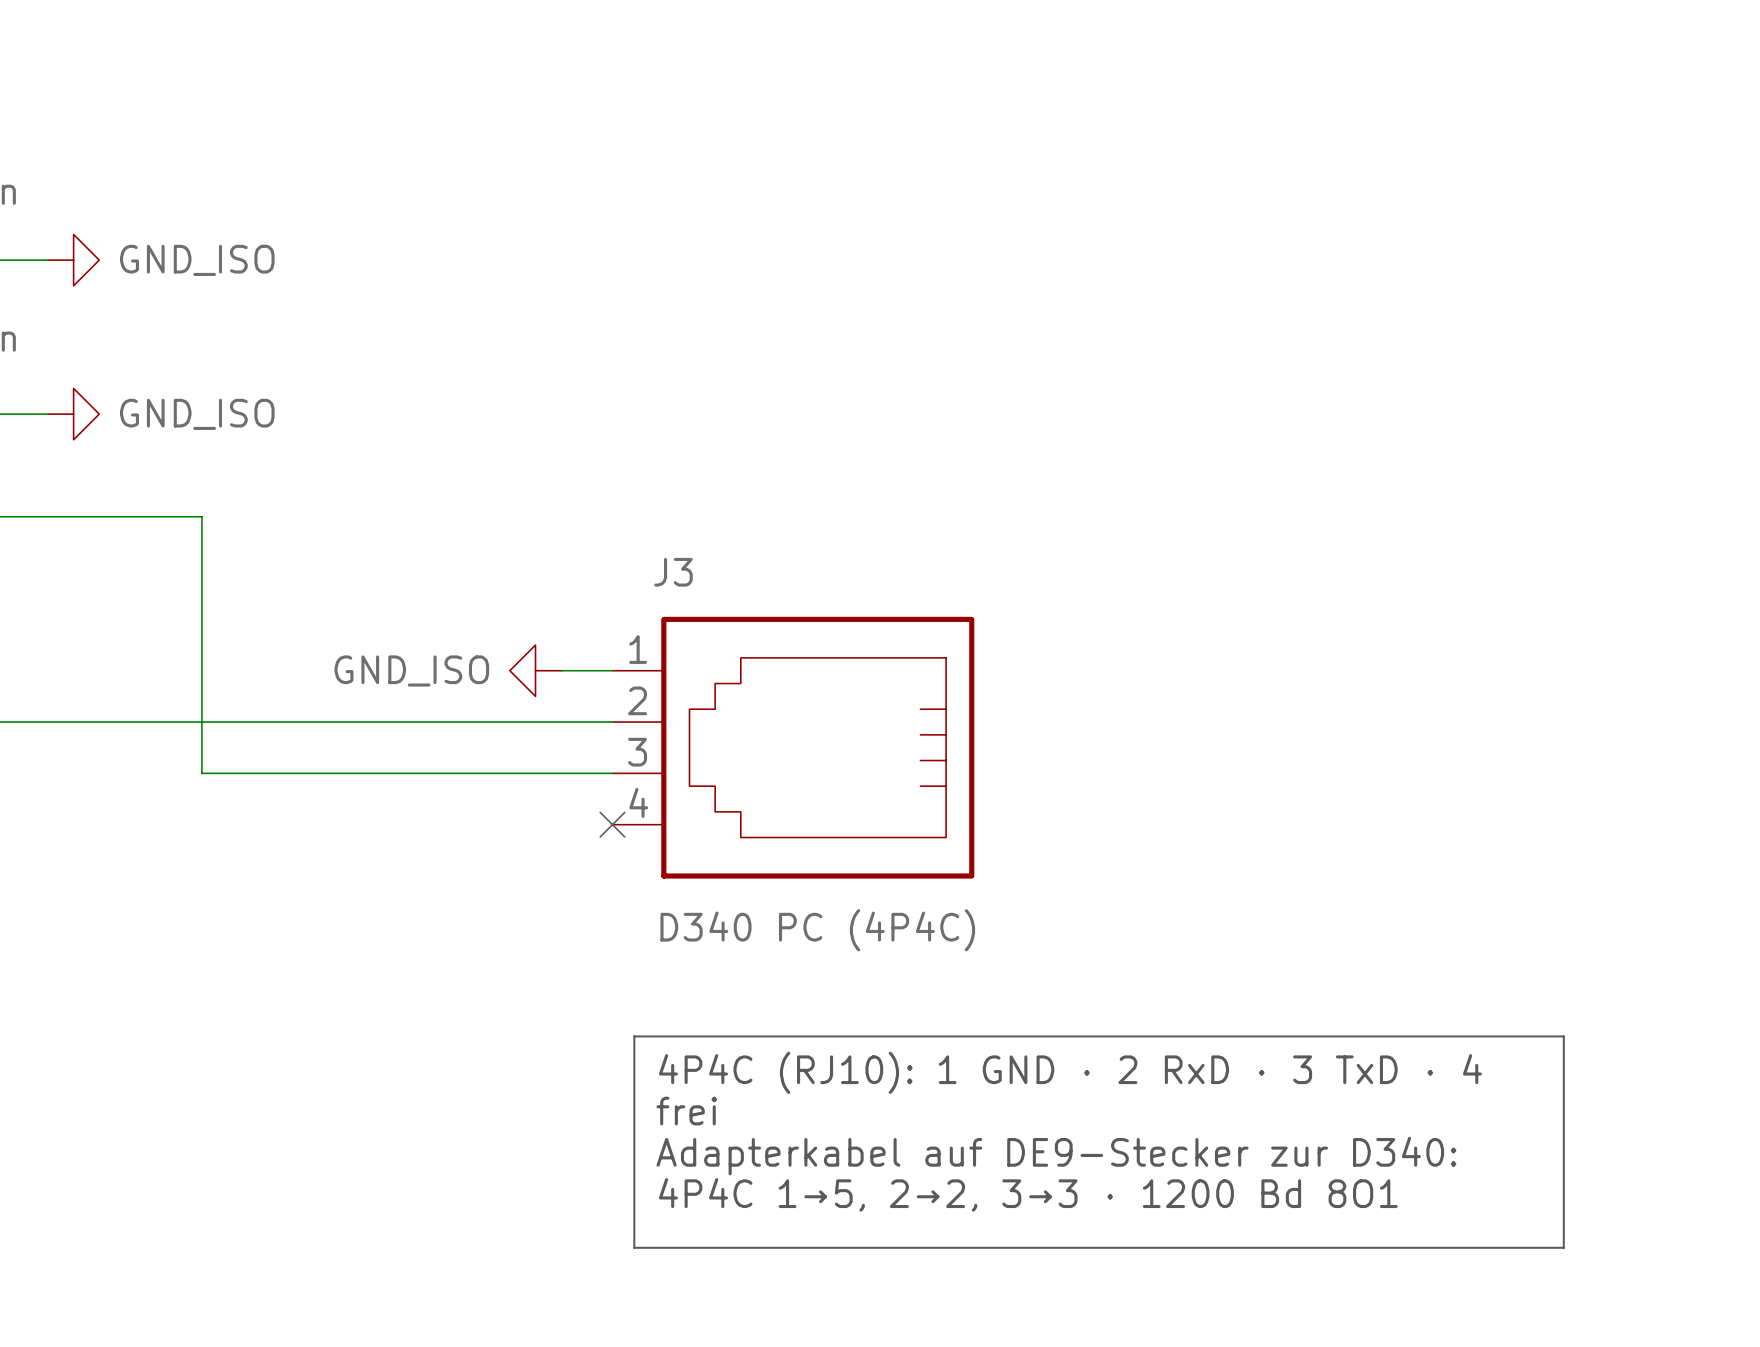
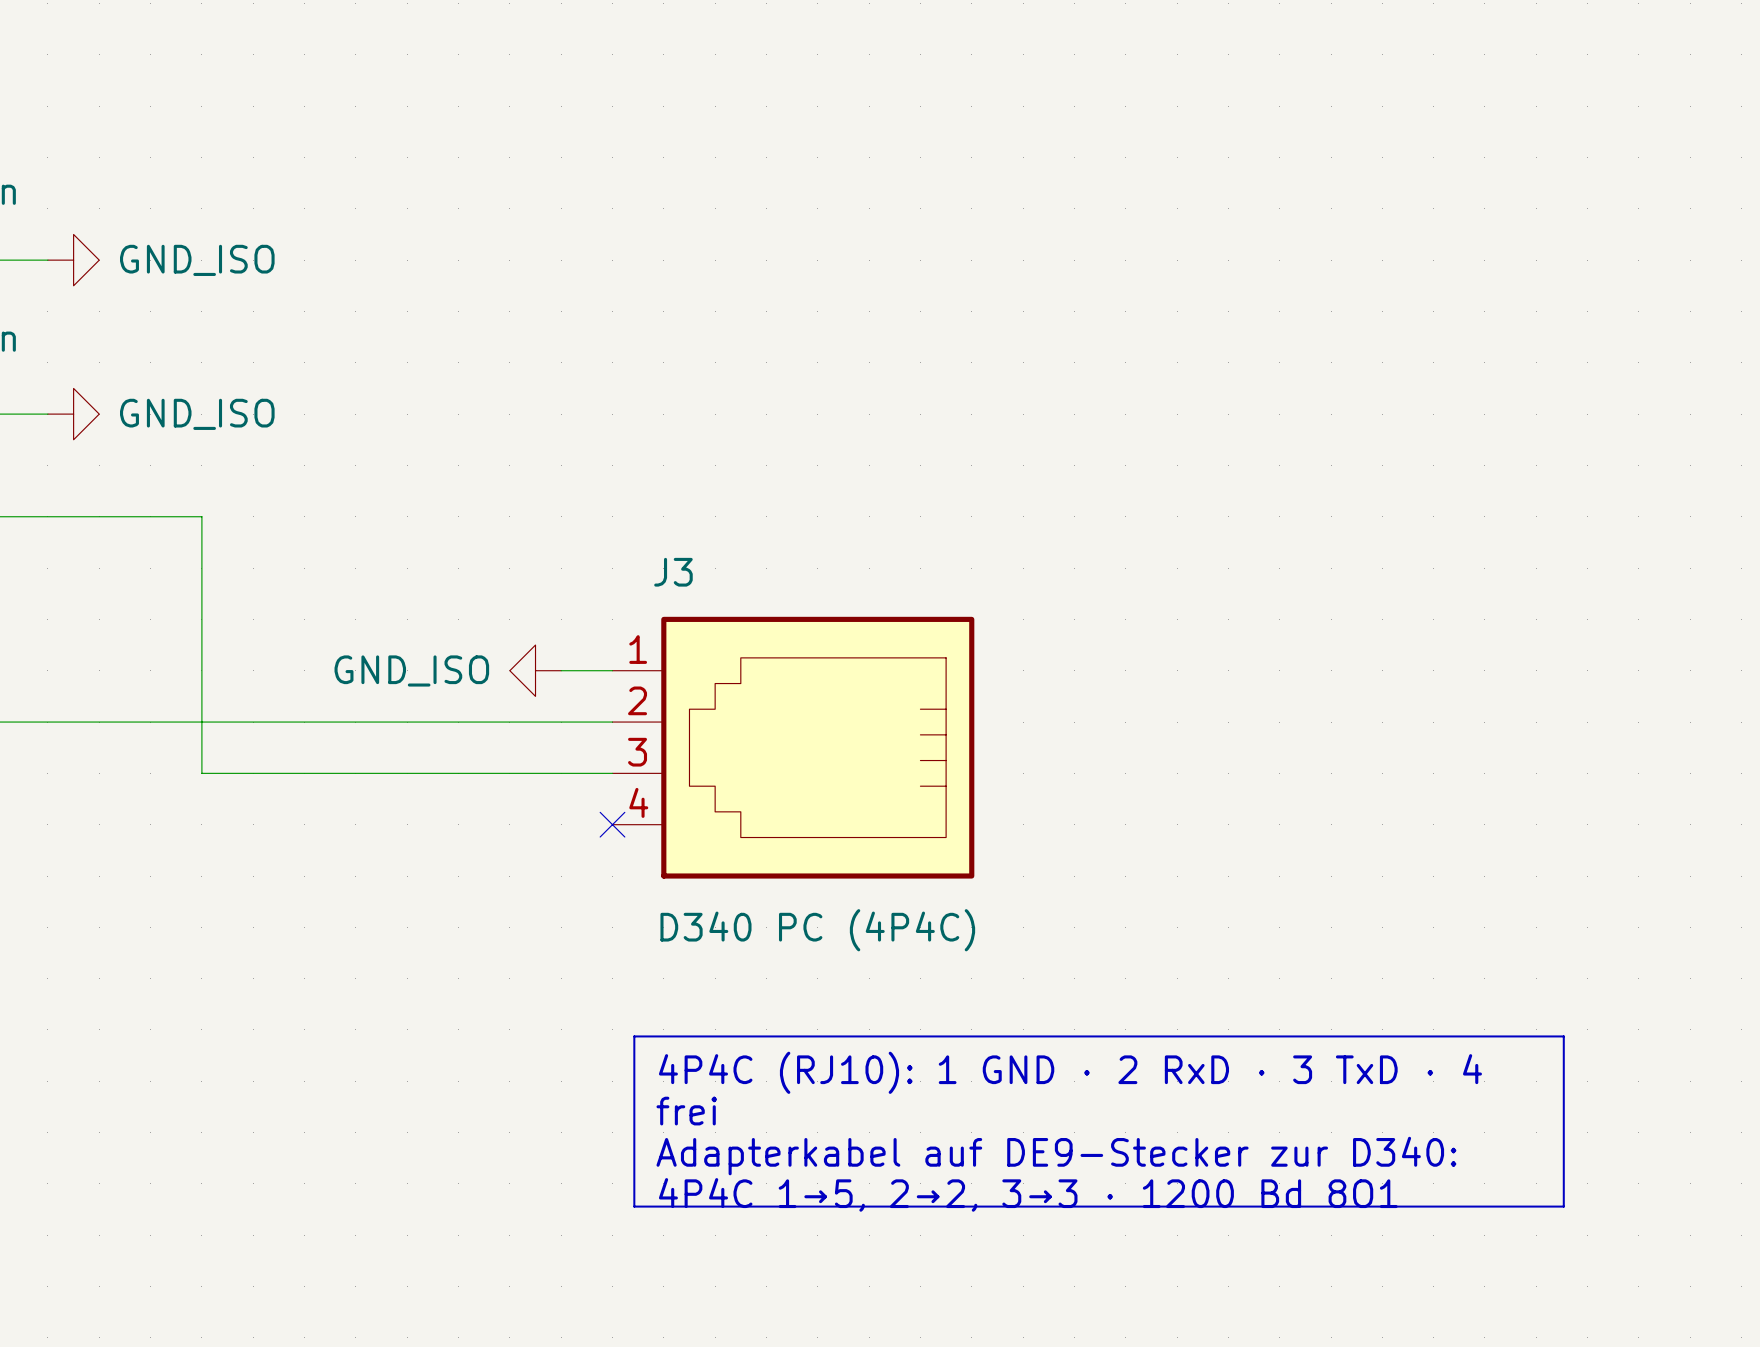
line: (634, 1206) (634, 1247) (1563, 1247) (1563, 1206) -> (634, 1206) (1563, 1206)

